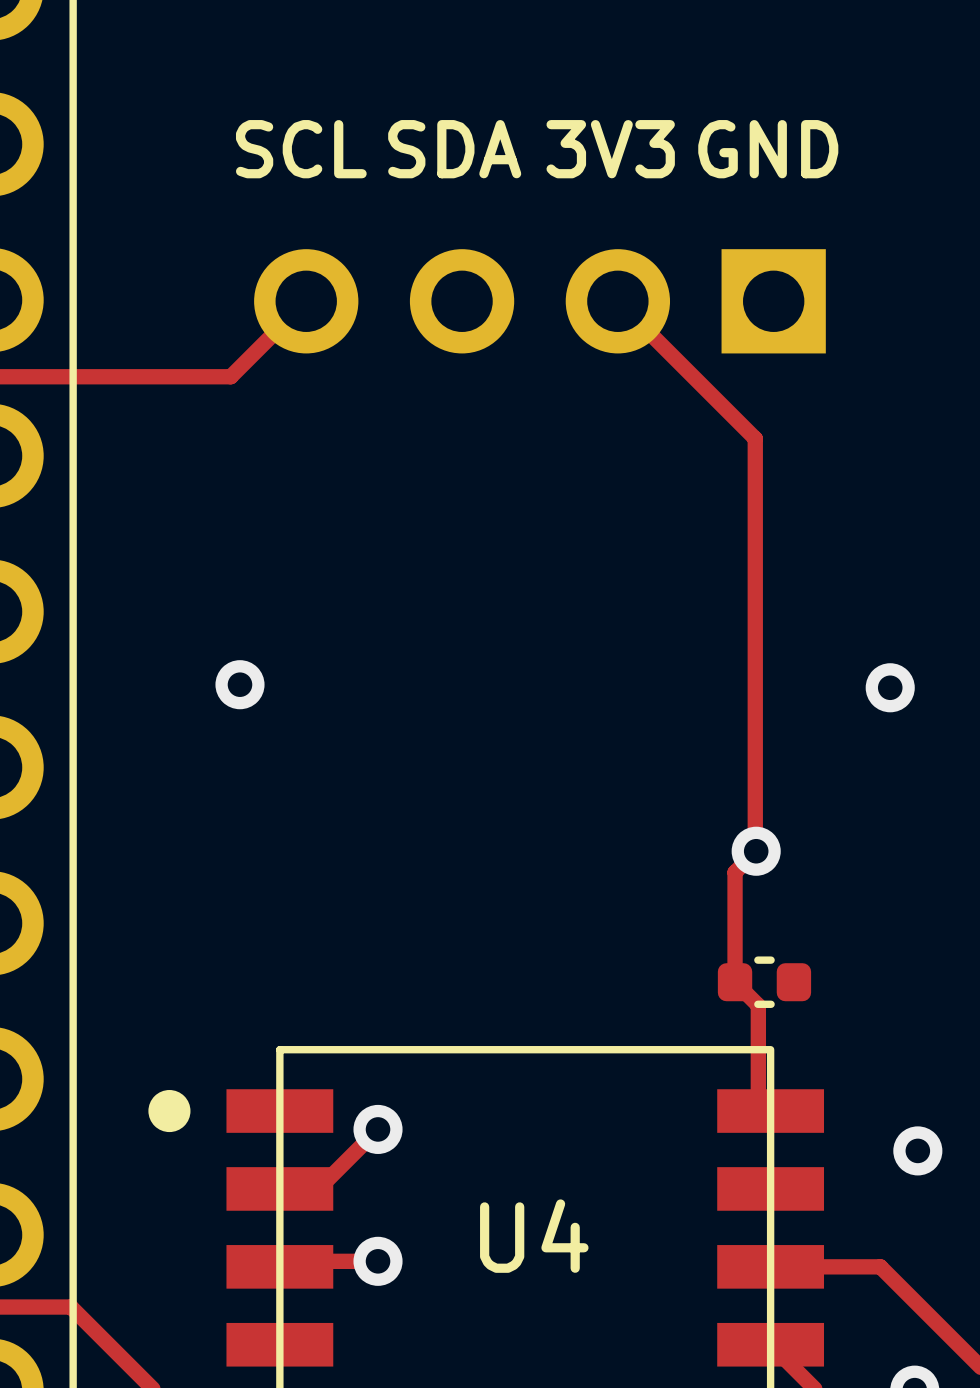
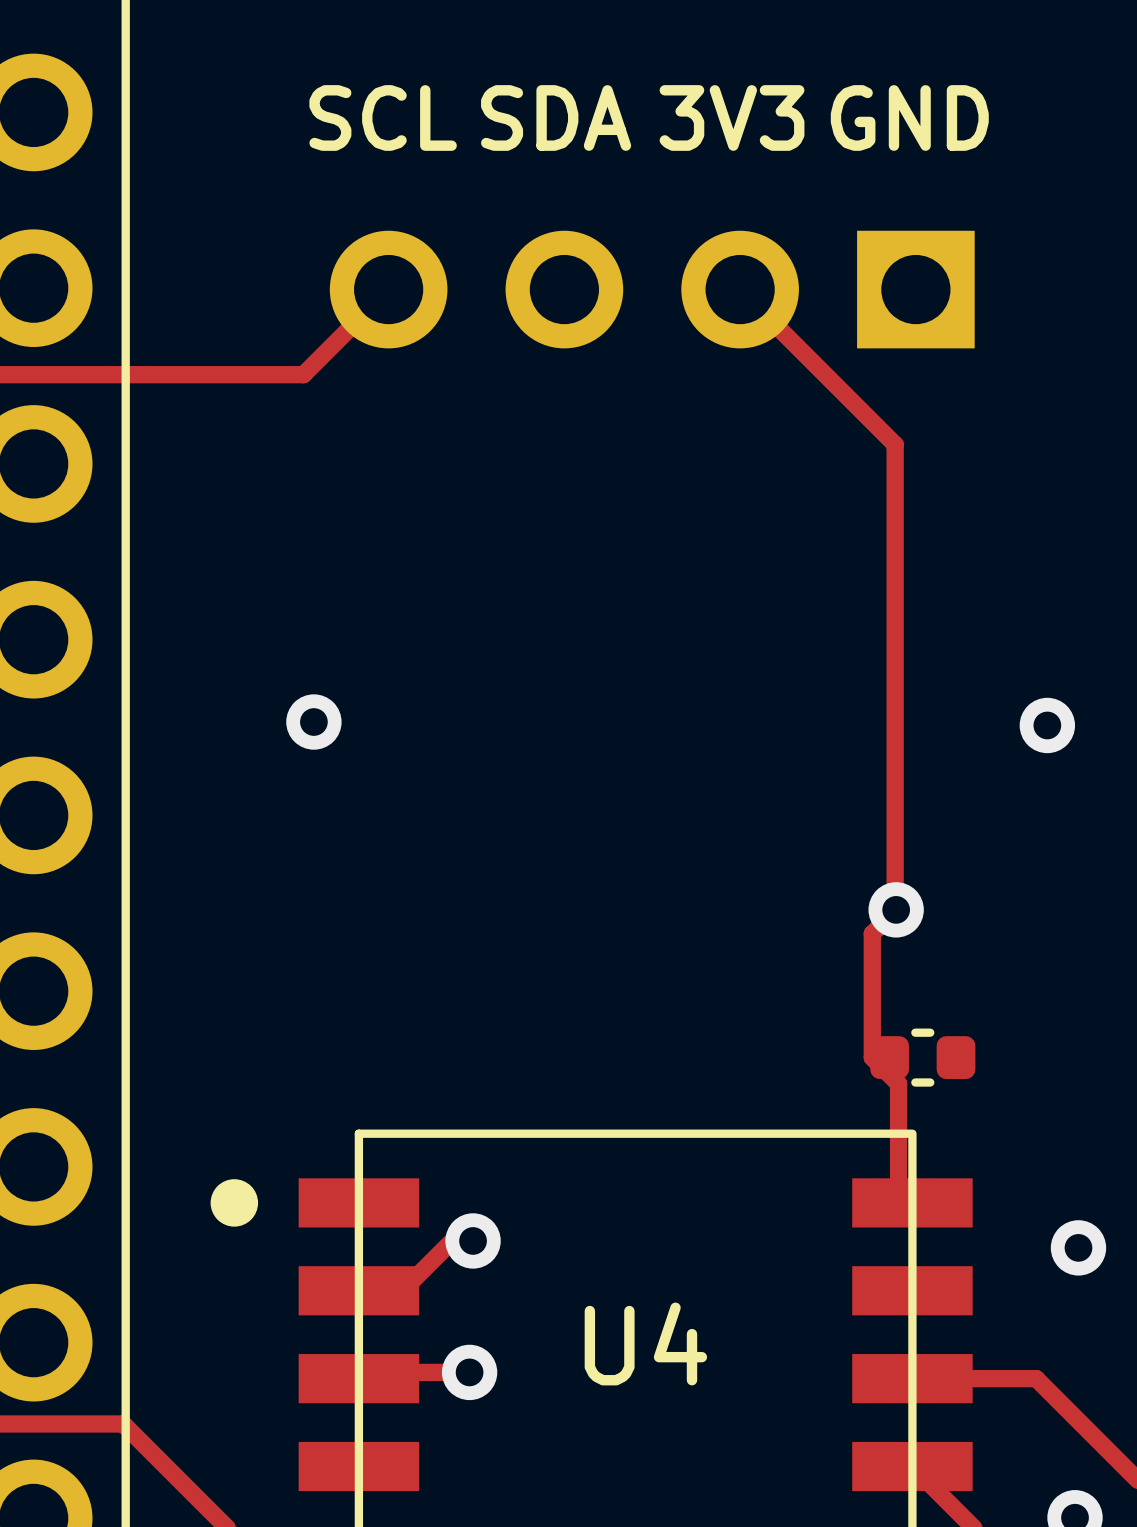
part position: (764, 982) -> (922, 1057)
via position: (378, 1129) -> (473, 1240)

